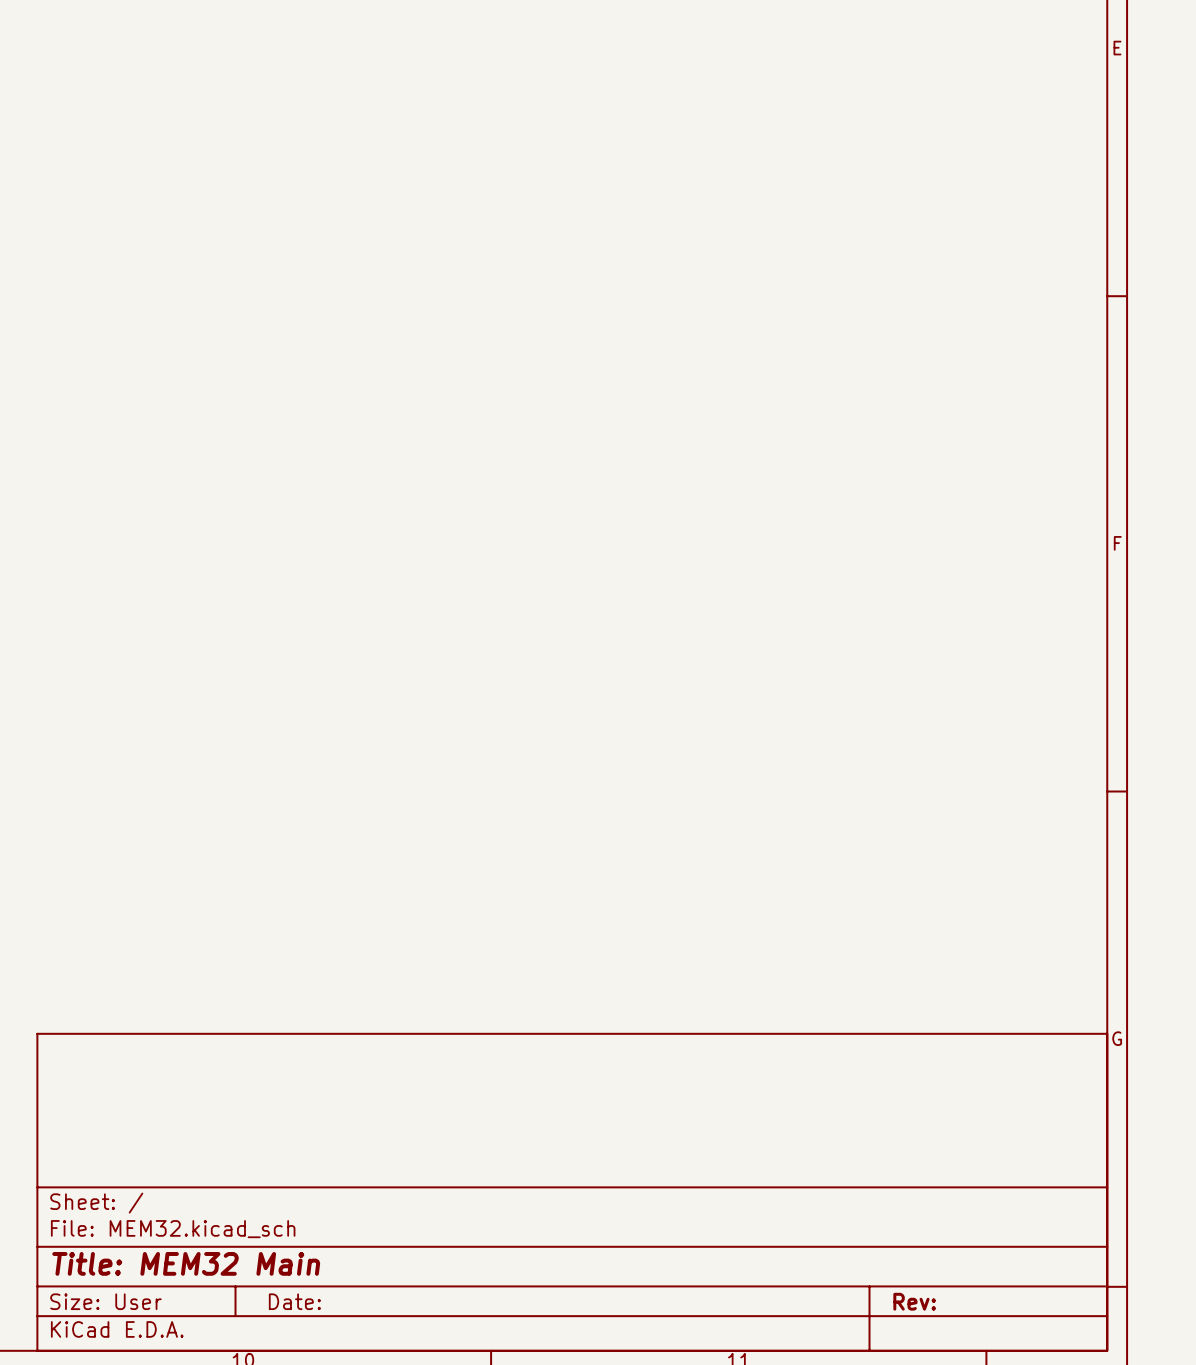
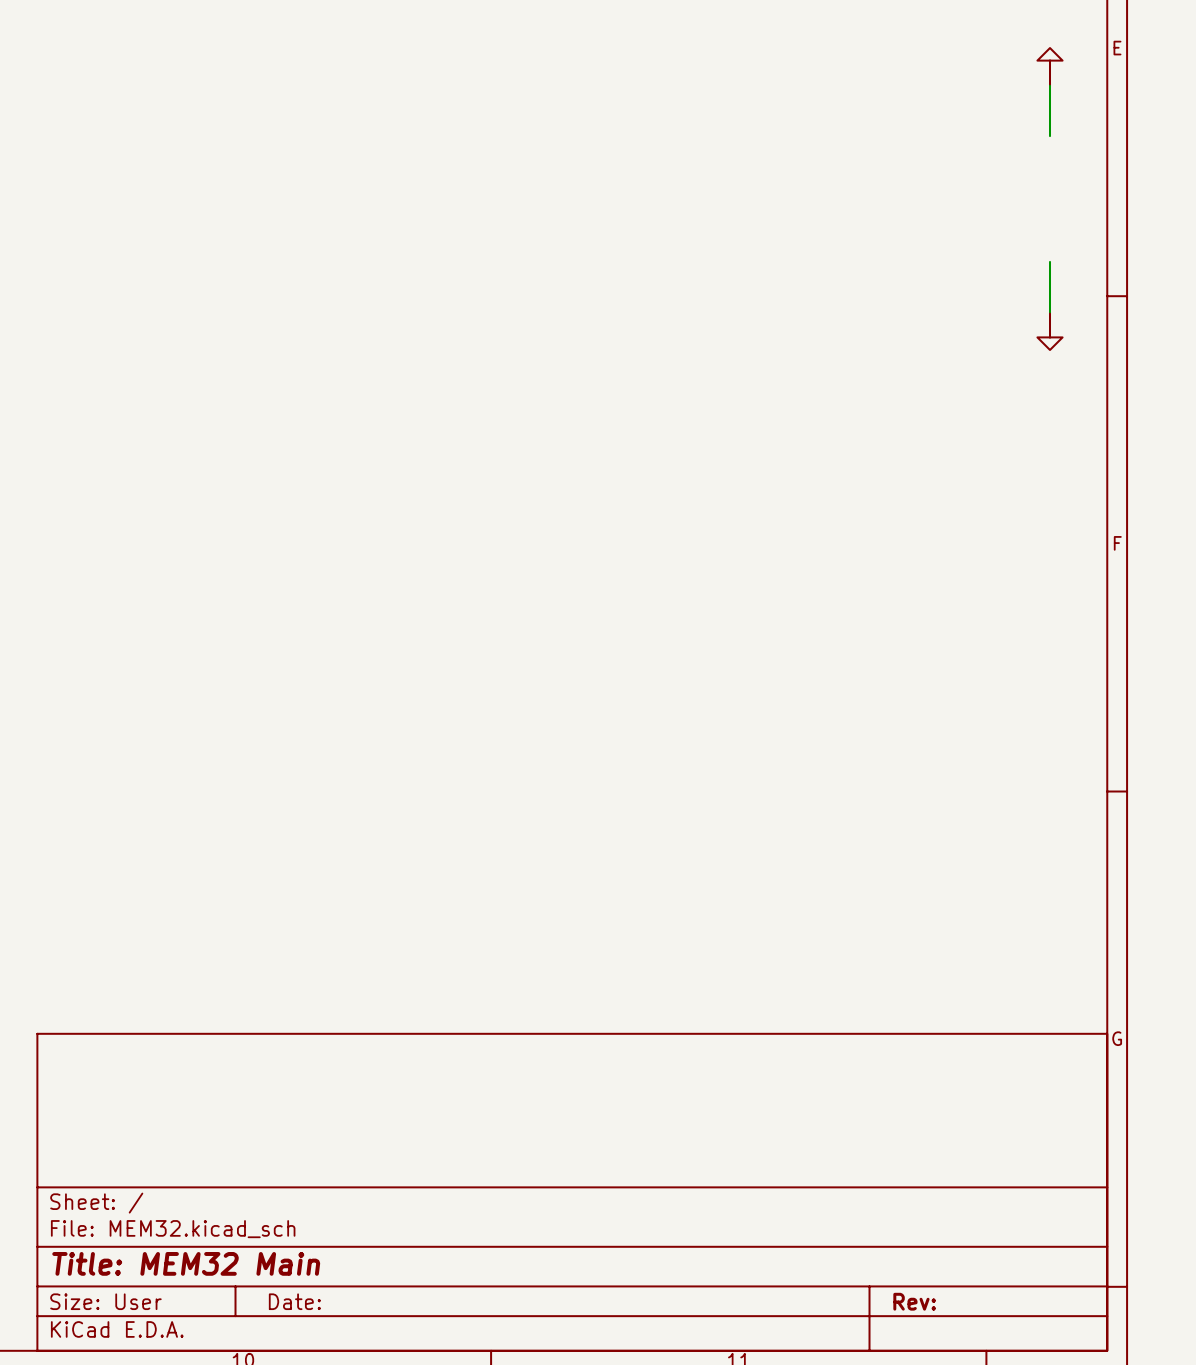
power symbol: none -> (1050, 66)
wire: none -> (1050, 85) (1050, 136)
wire: none -> (1050, 261) (1050, 312)
power symbol: none -> (1050, 331)

